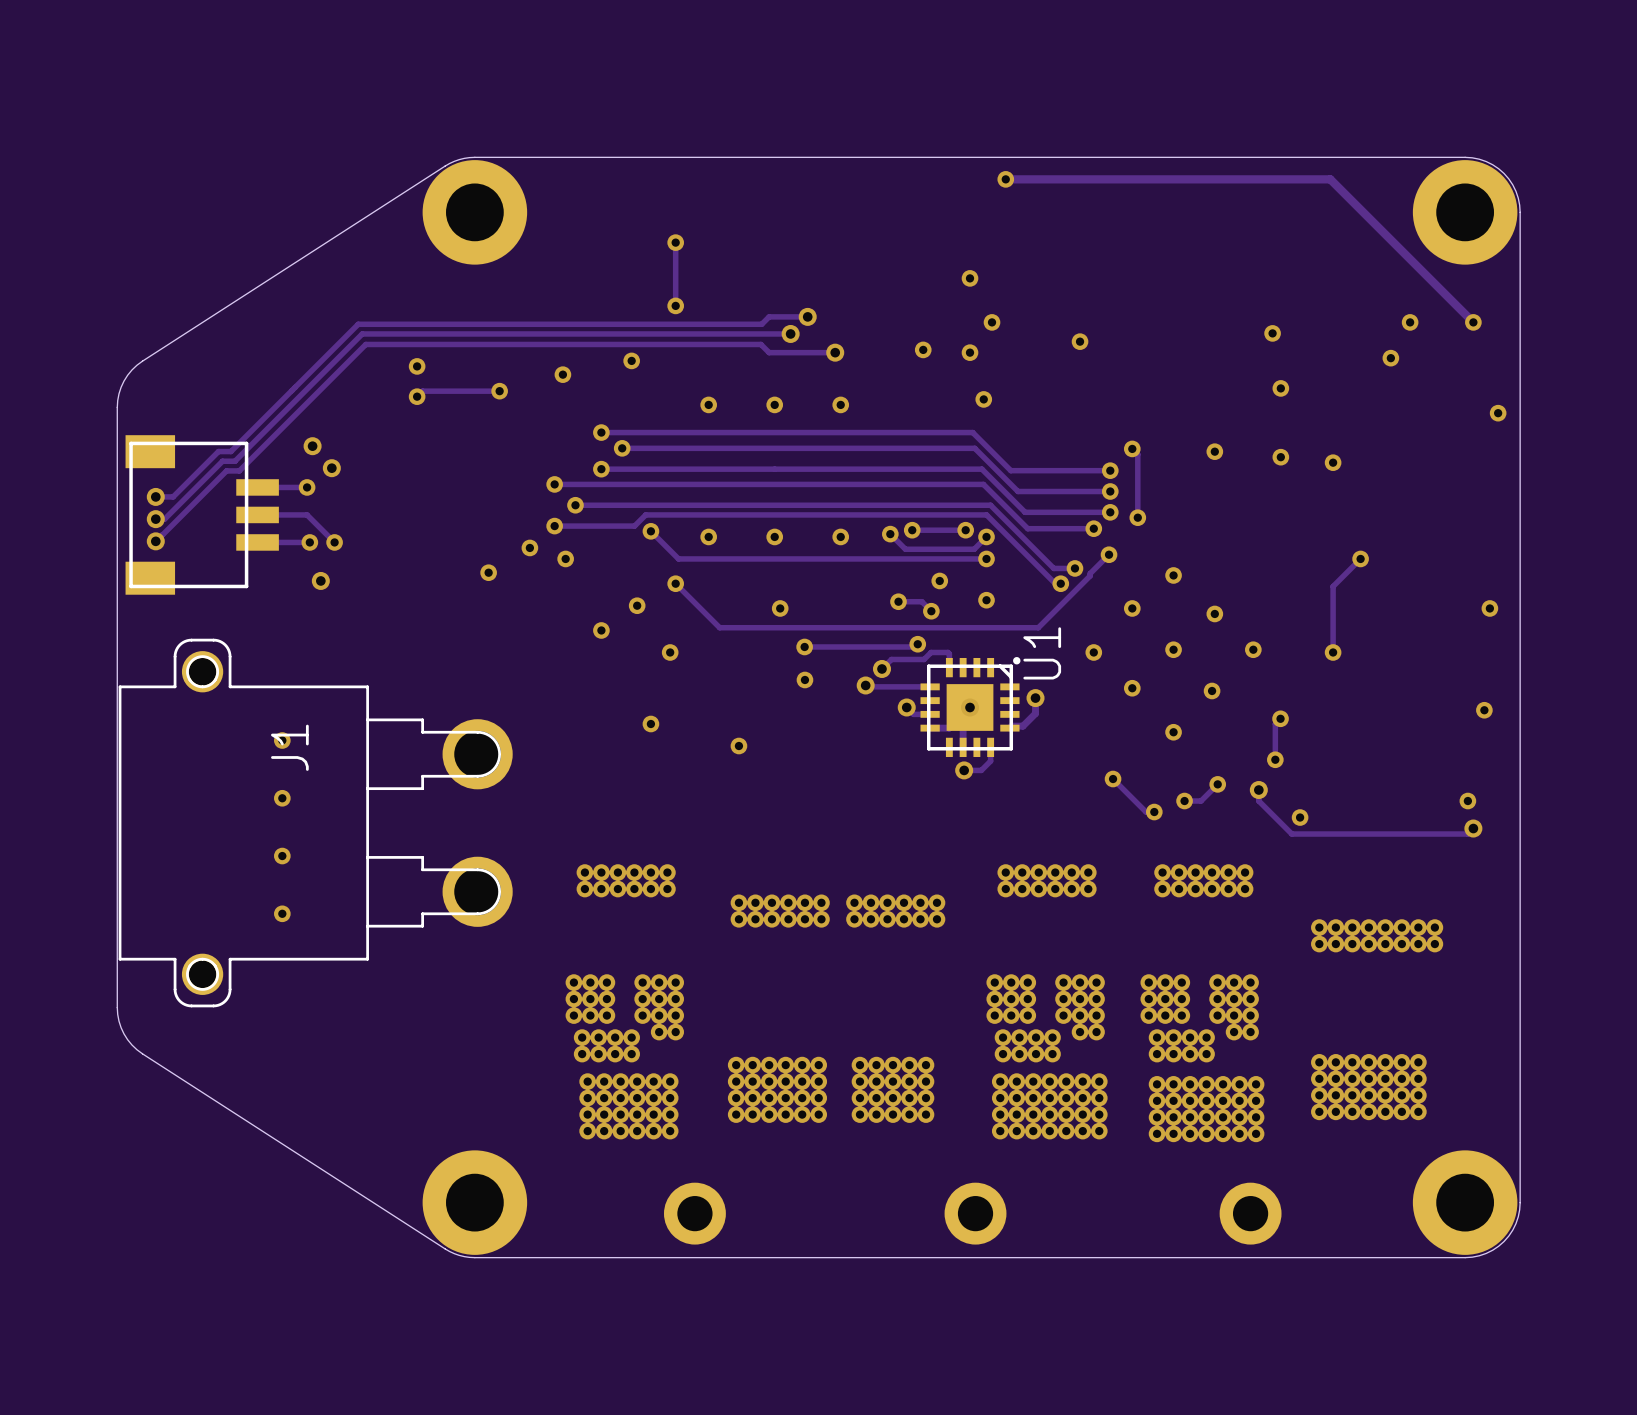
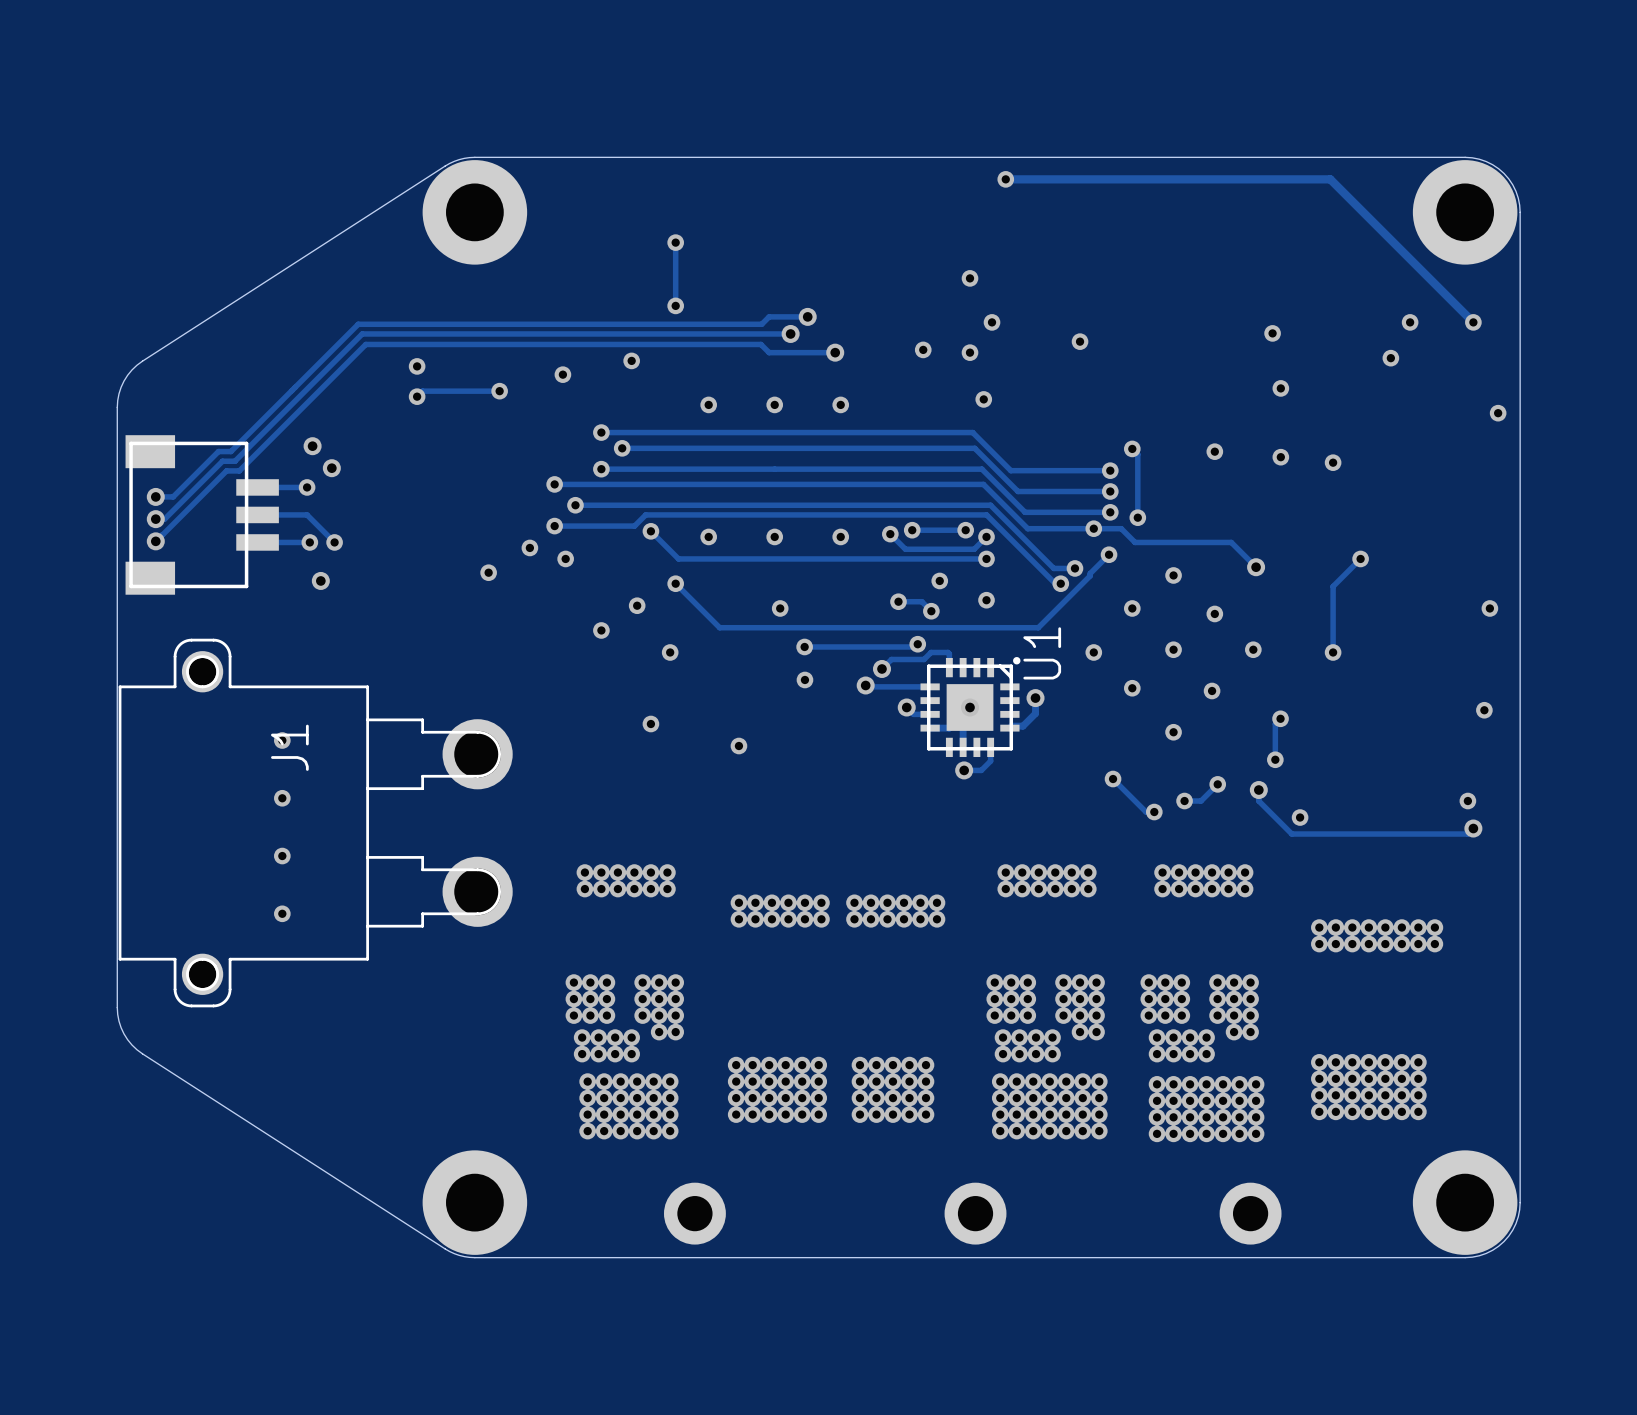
track: none -> (1093, 528) (1121, 528) (1135, 542) (1231, 542) (1256, 567)
via: none -> (1256, 567)

